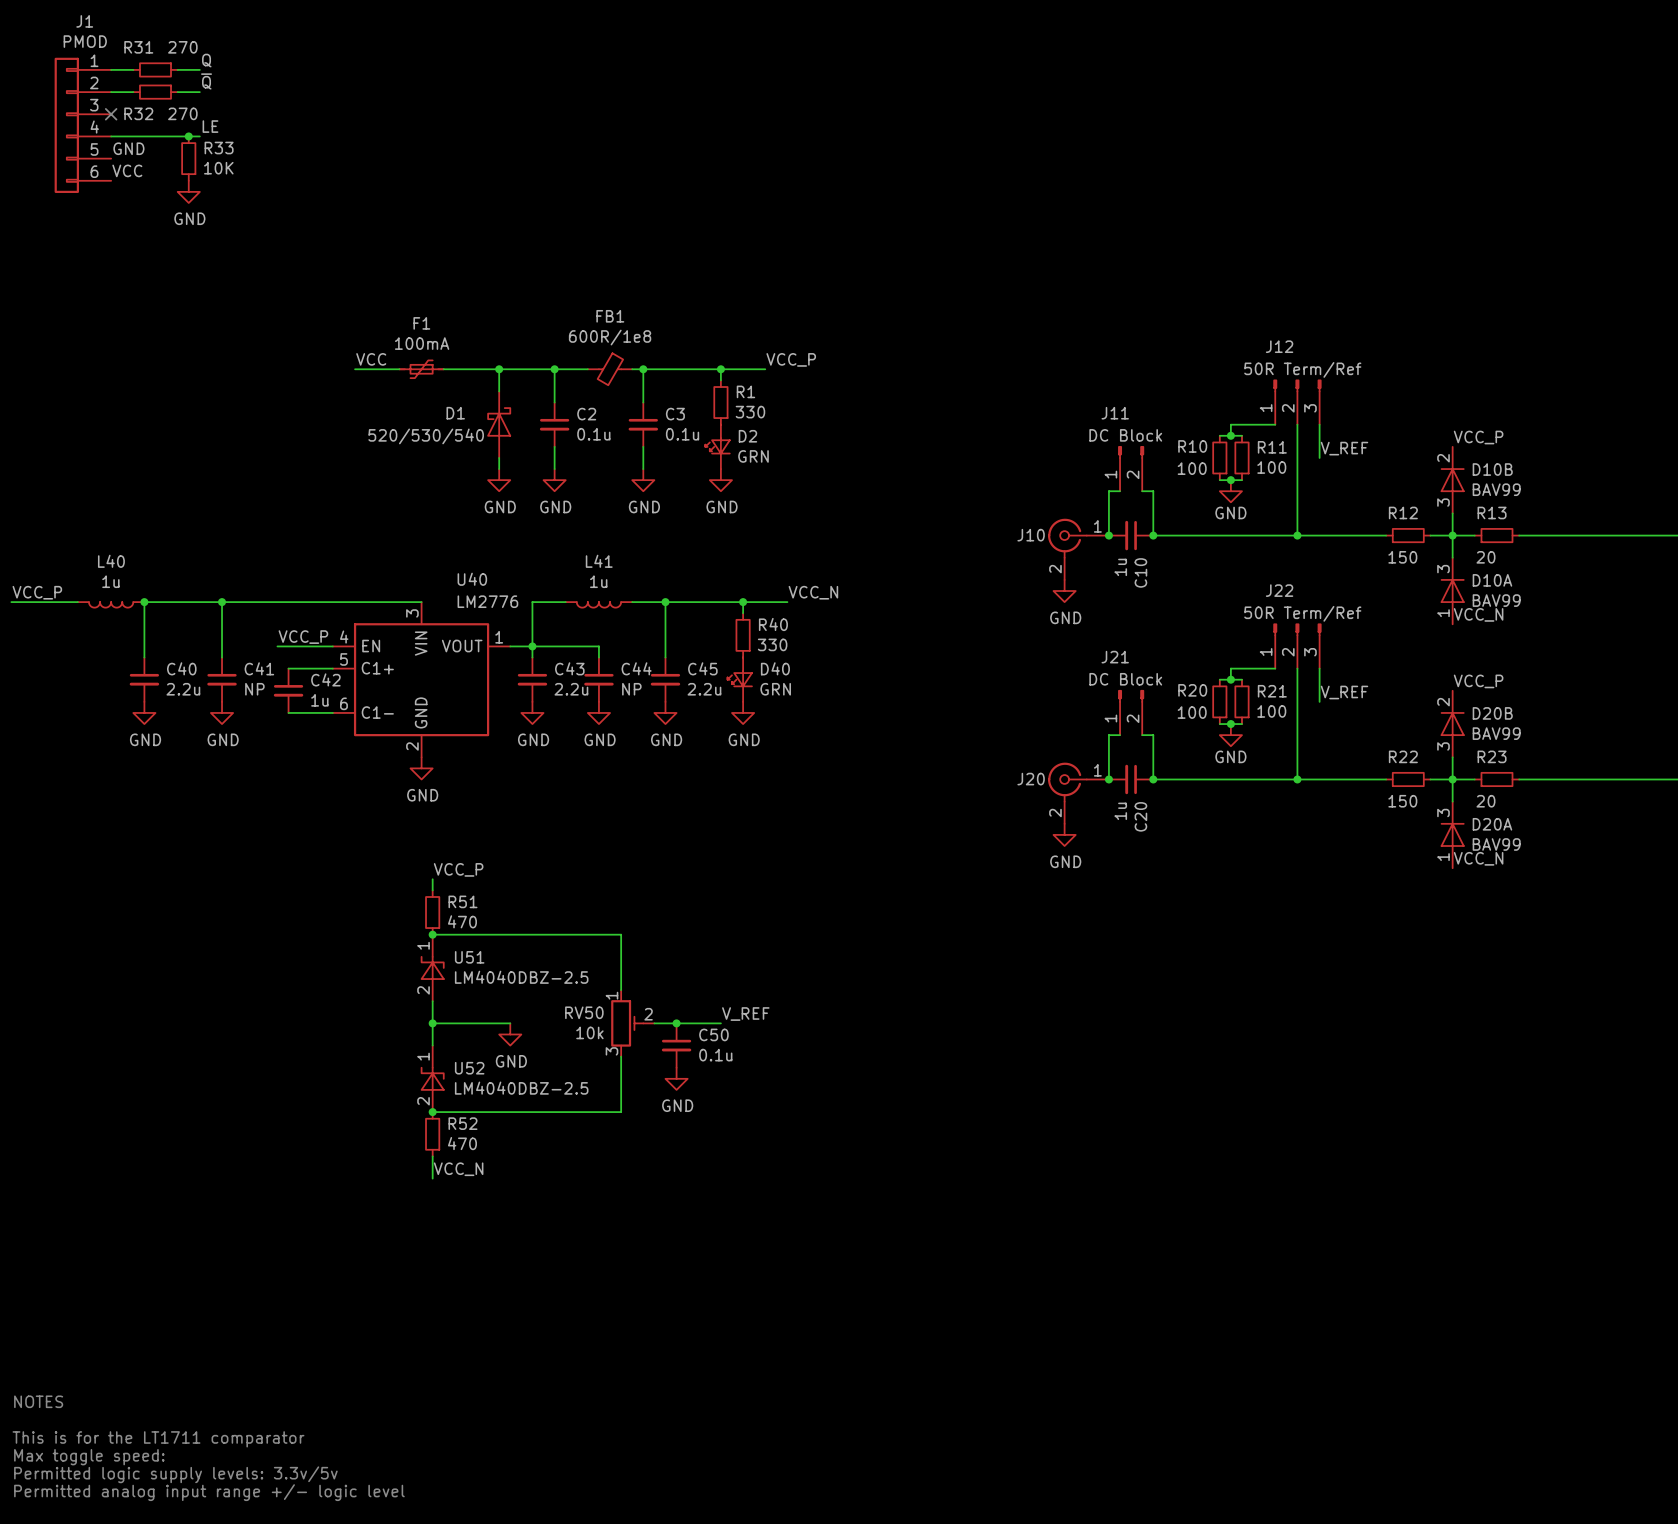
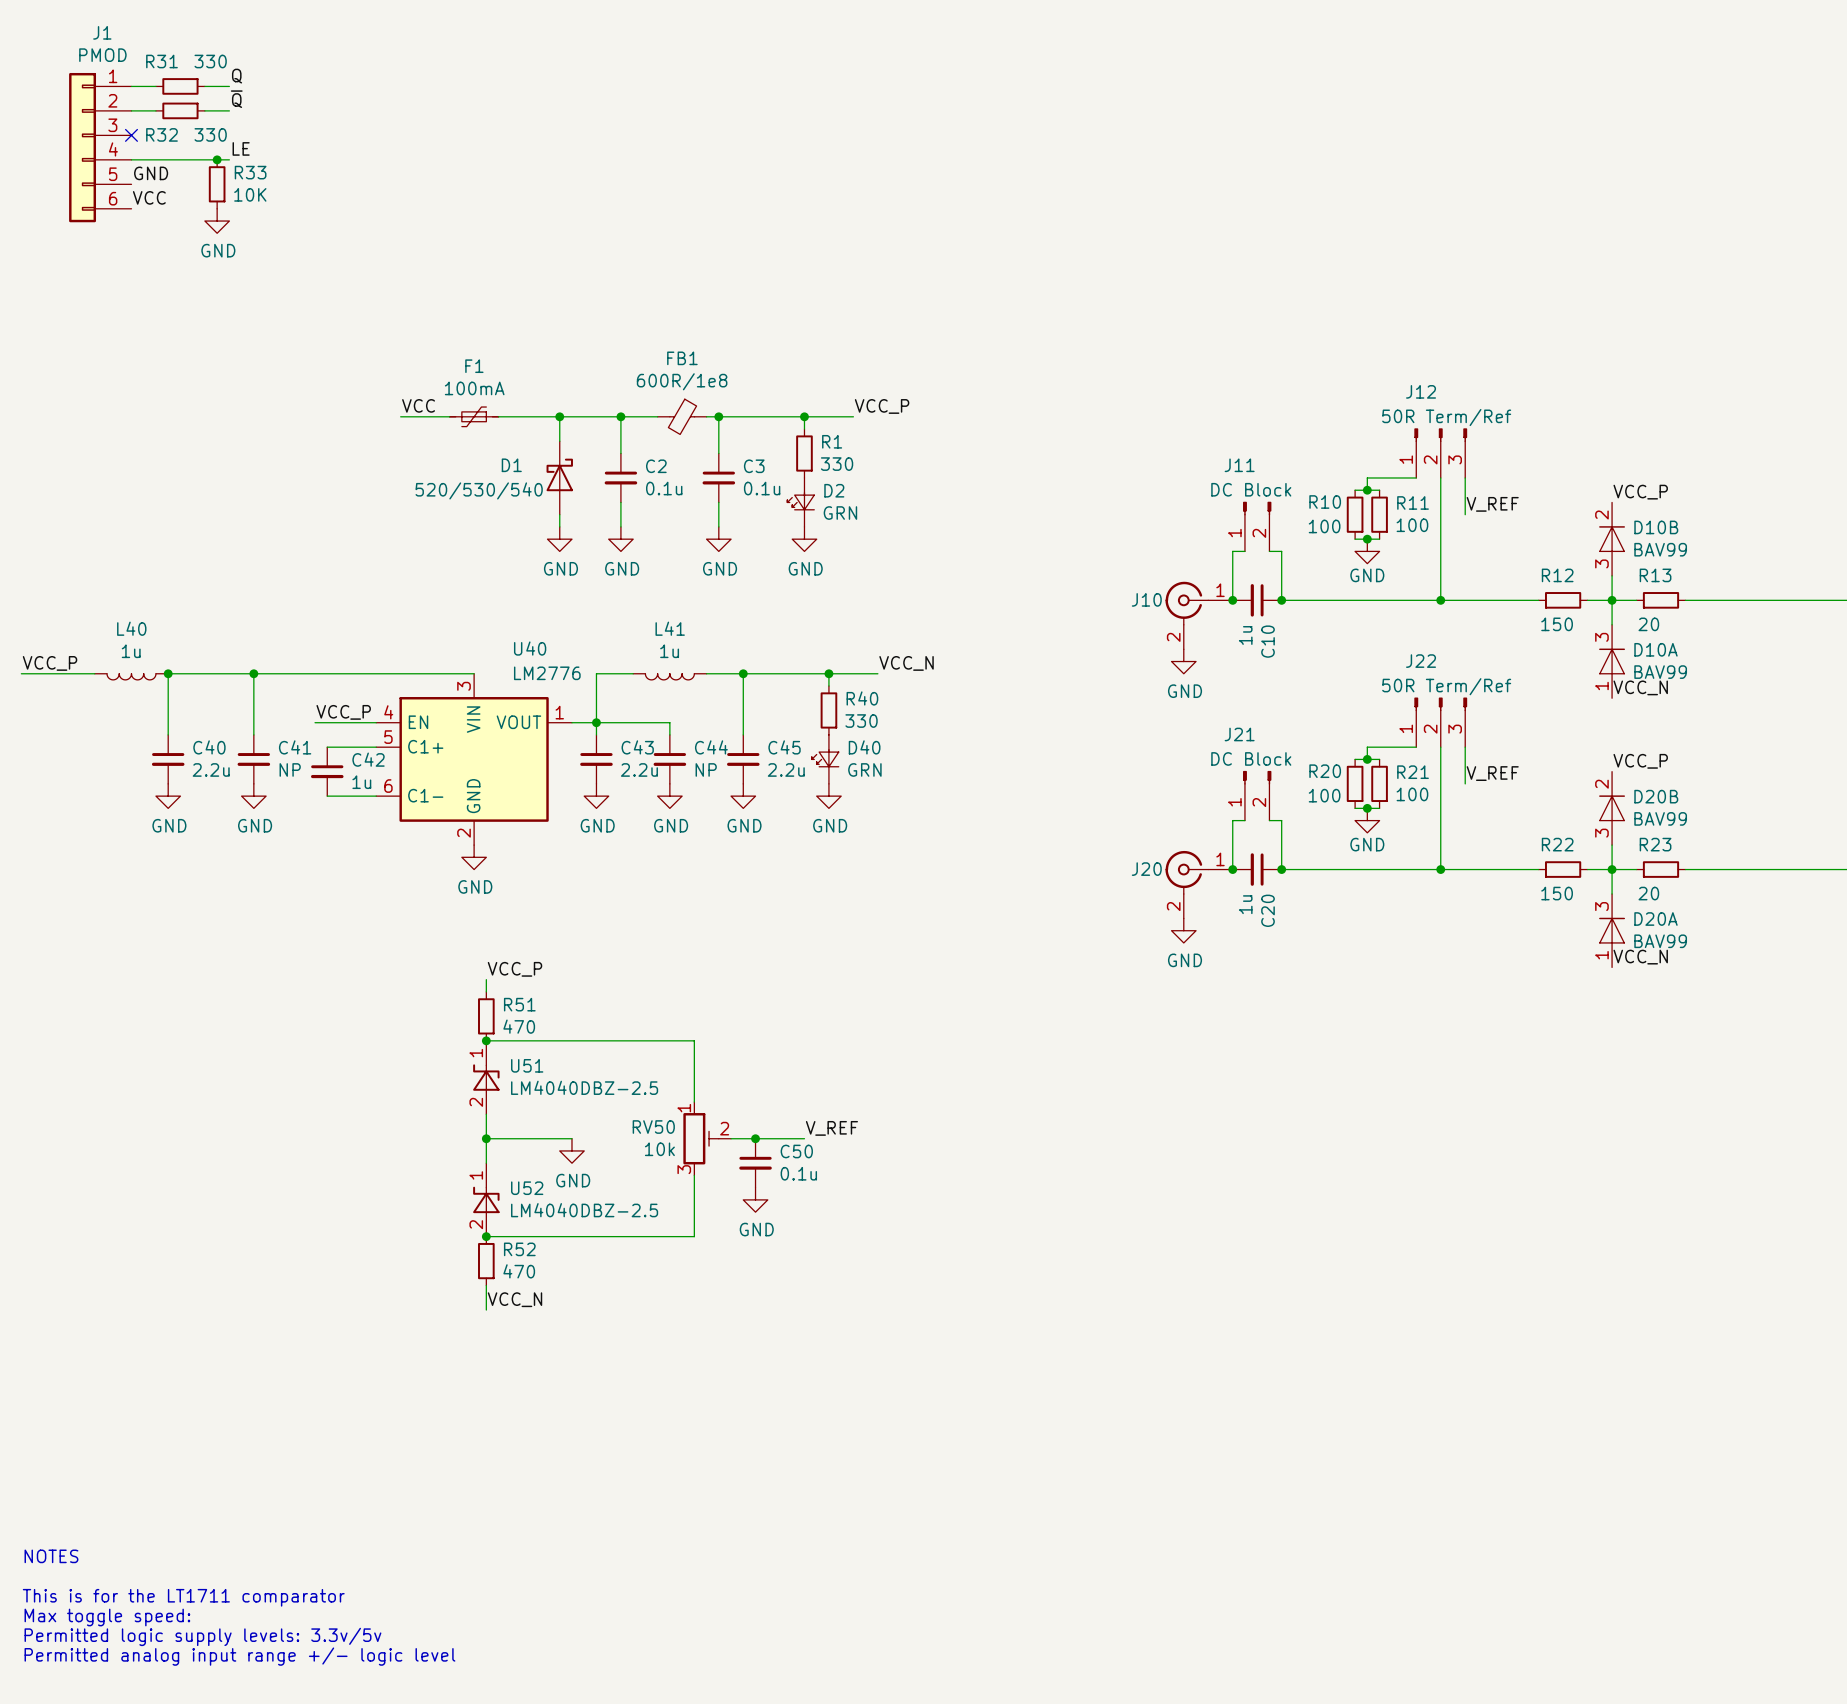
R31 value: 270 (182, 47) -> 330 (210, 61)
R32 value: 270 (182, 113) -> 330 (210, 134)

